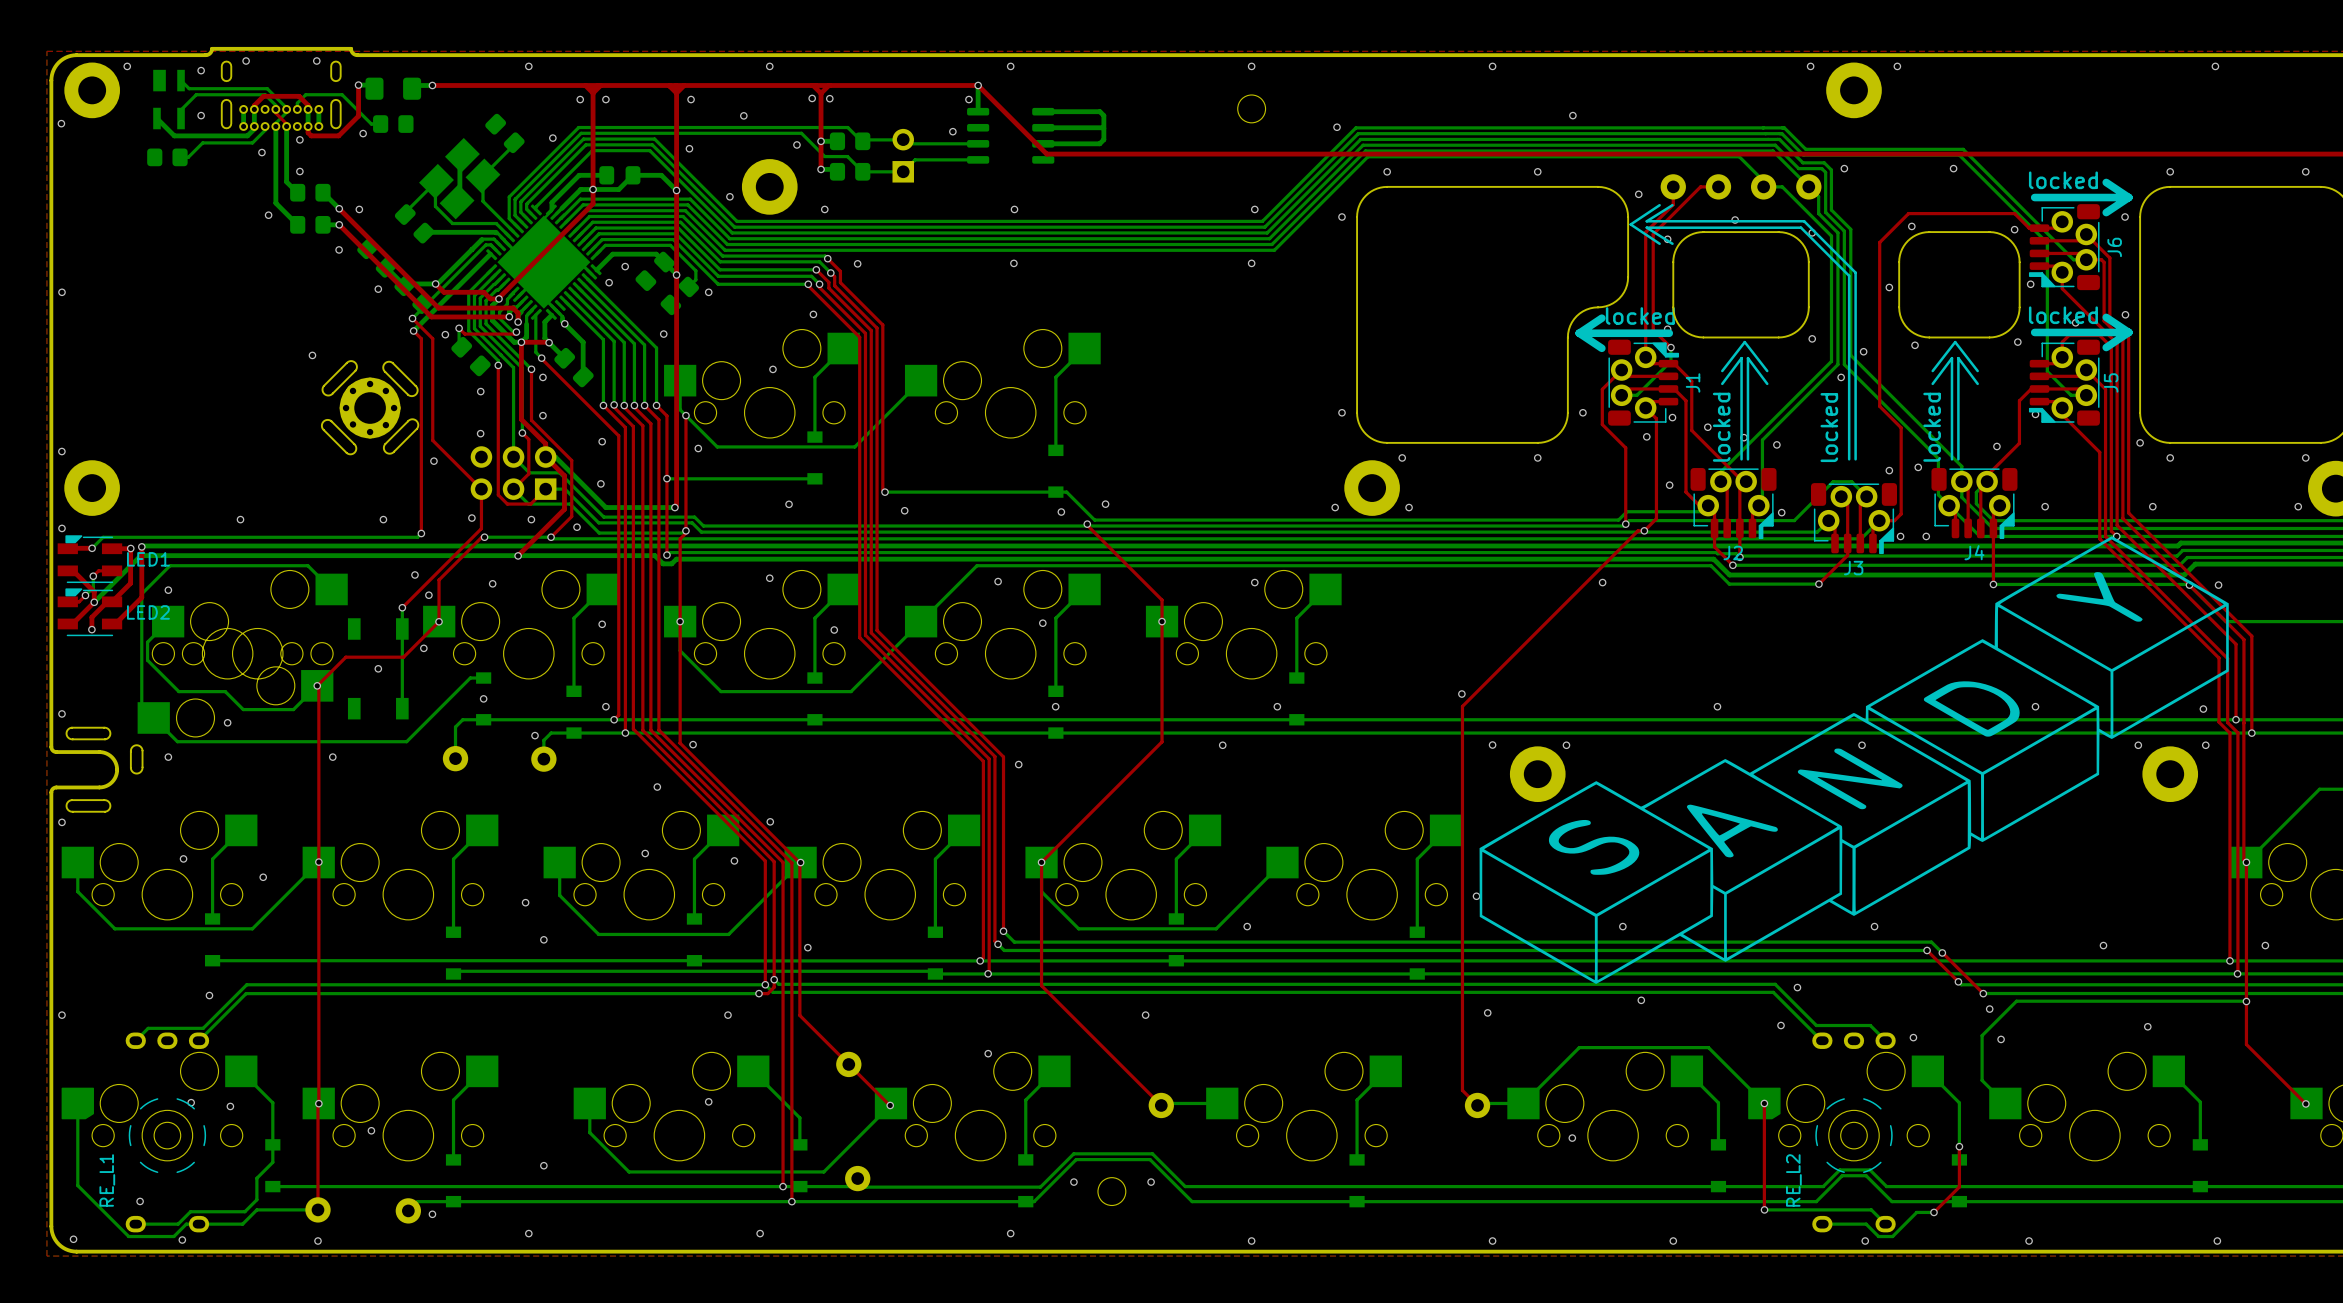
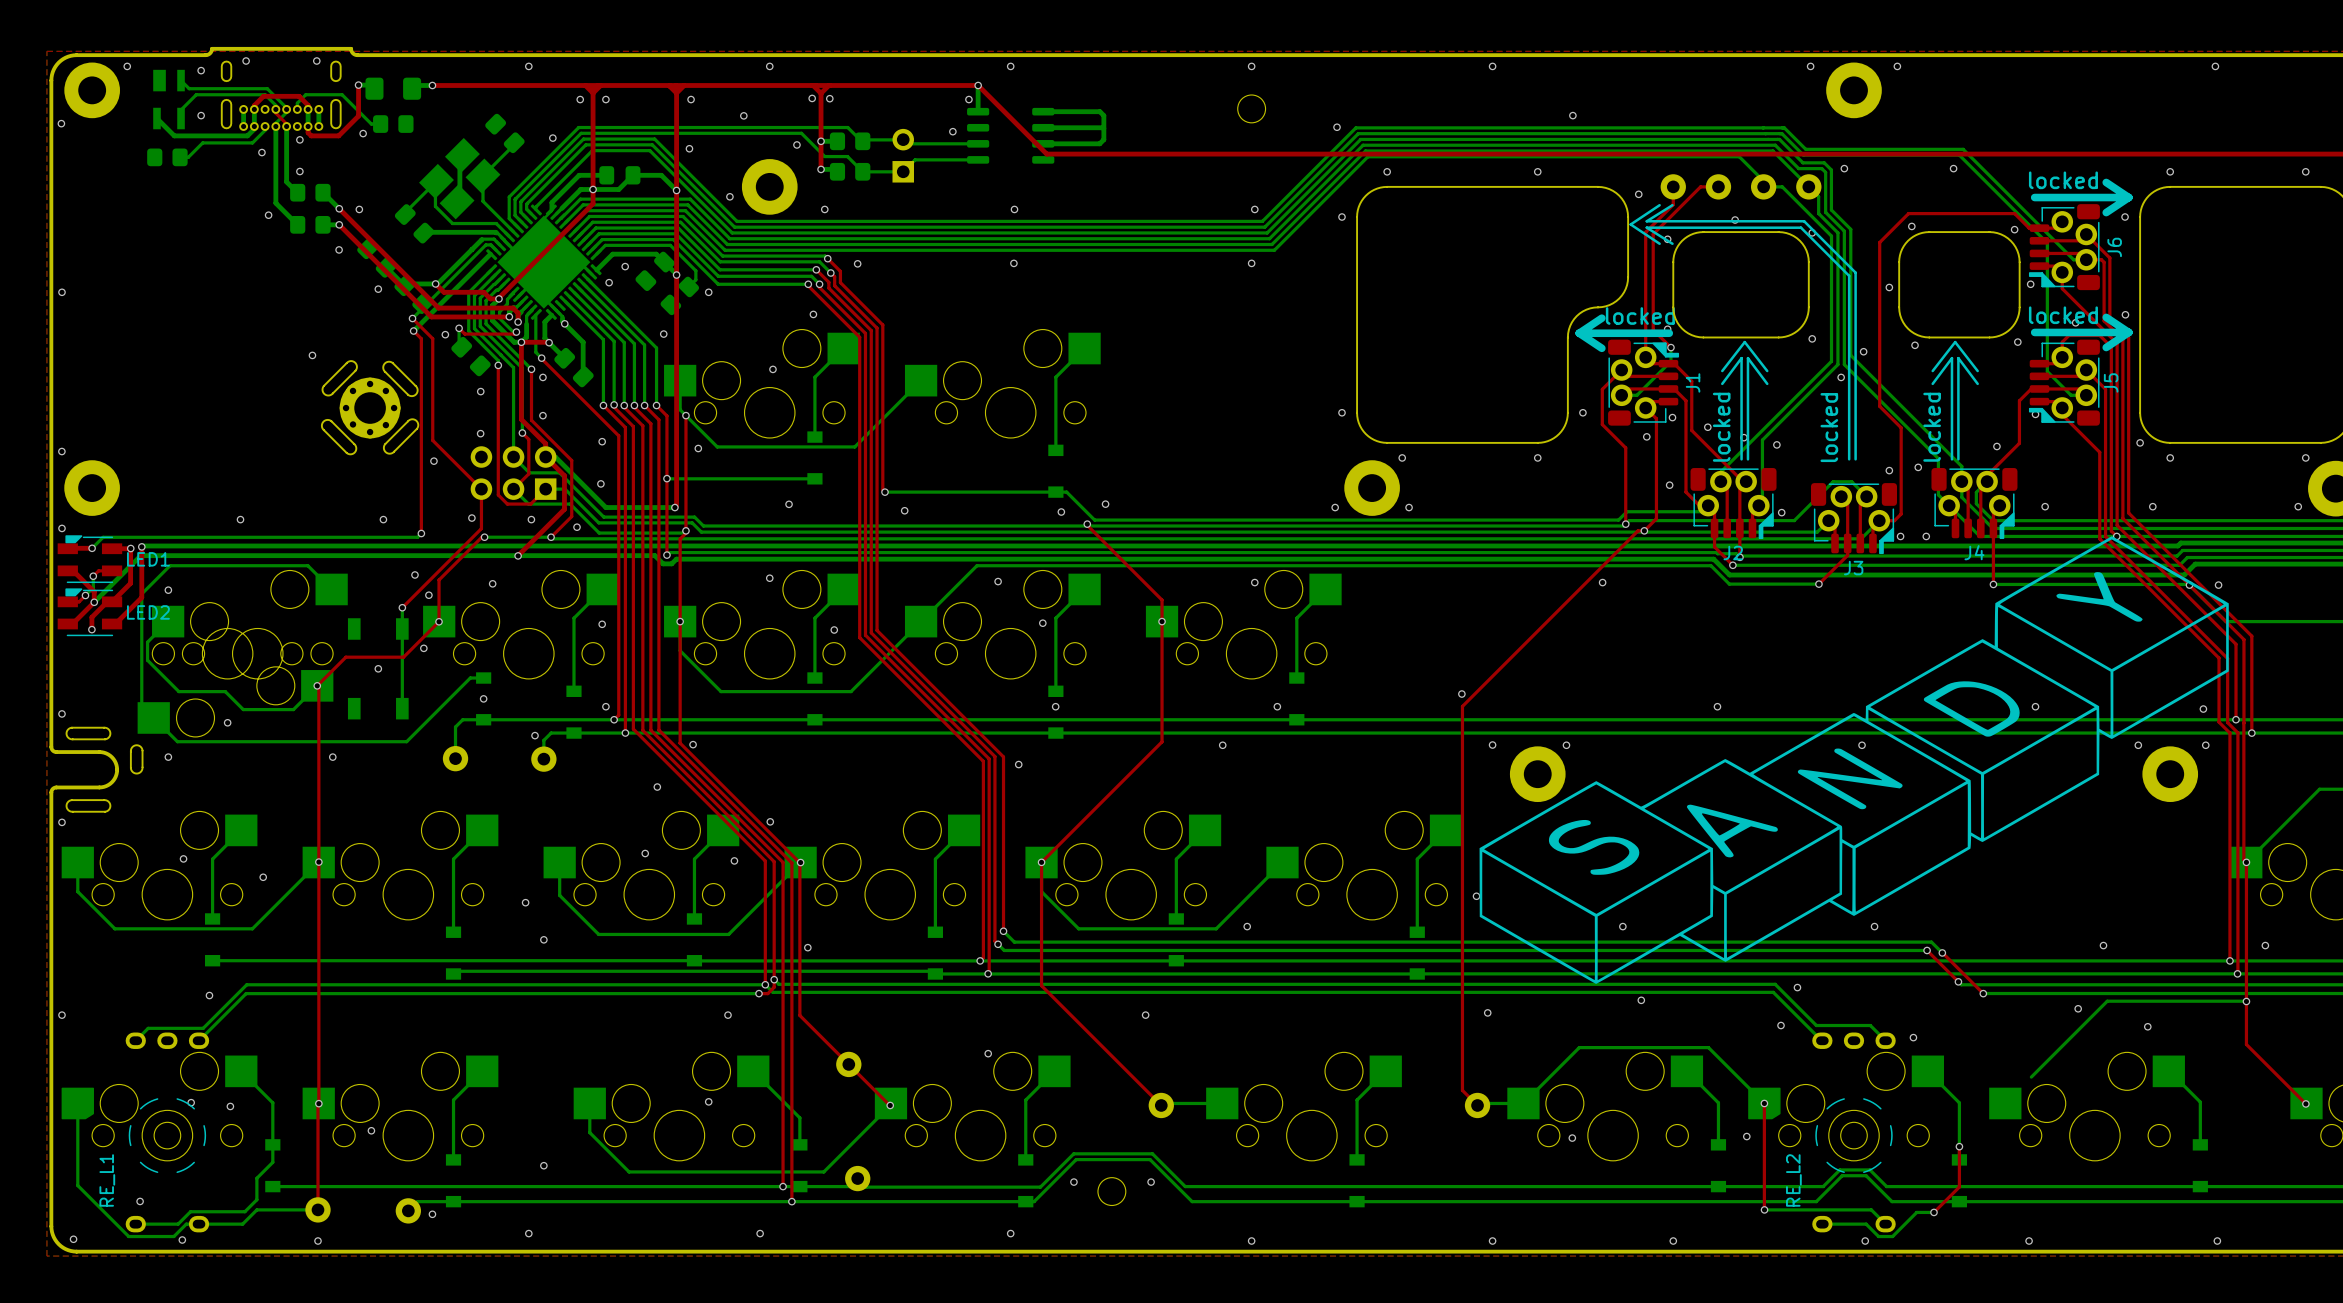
bottom track: (2107, 1001) (2016, 1001) (1982, 1035) (1982, 1080) (2005, 1103) -> (2107, 1001) (2031, 1077)
via: none -> (2078, 1008)
via: (1989, 1009) -> none
via: (2001, 1039) -> none
via: none -> (1746, 1136)

